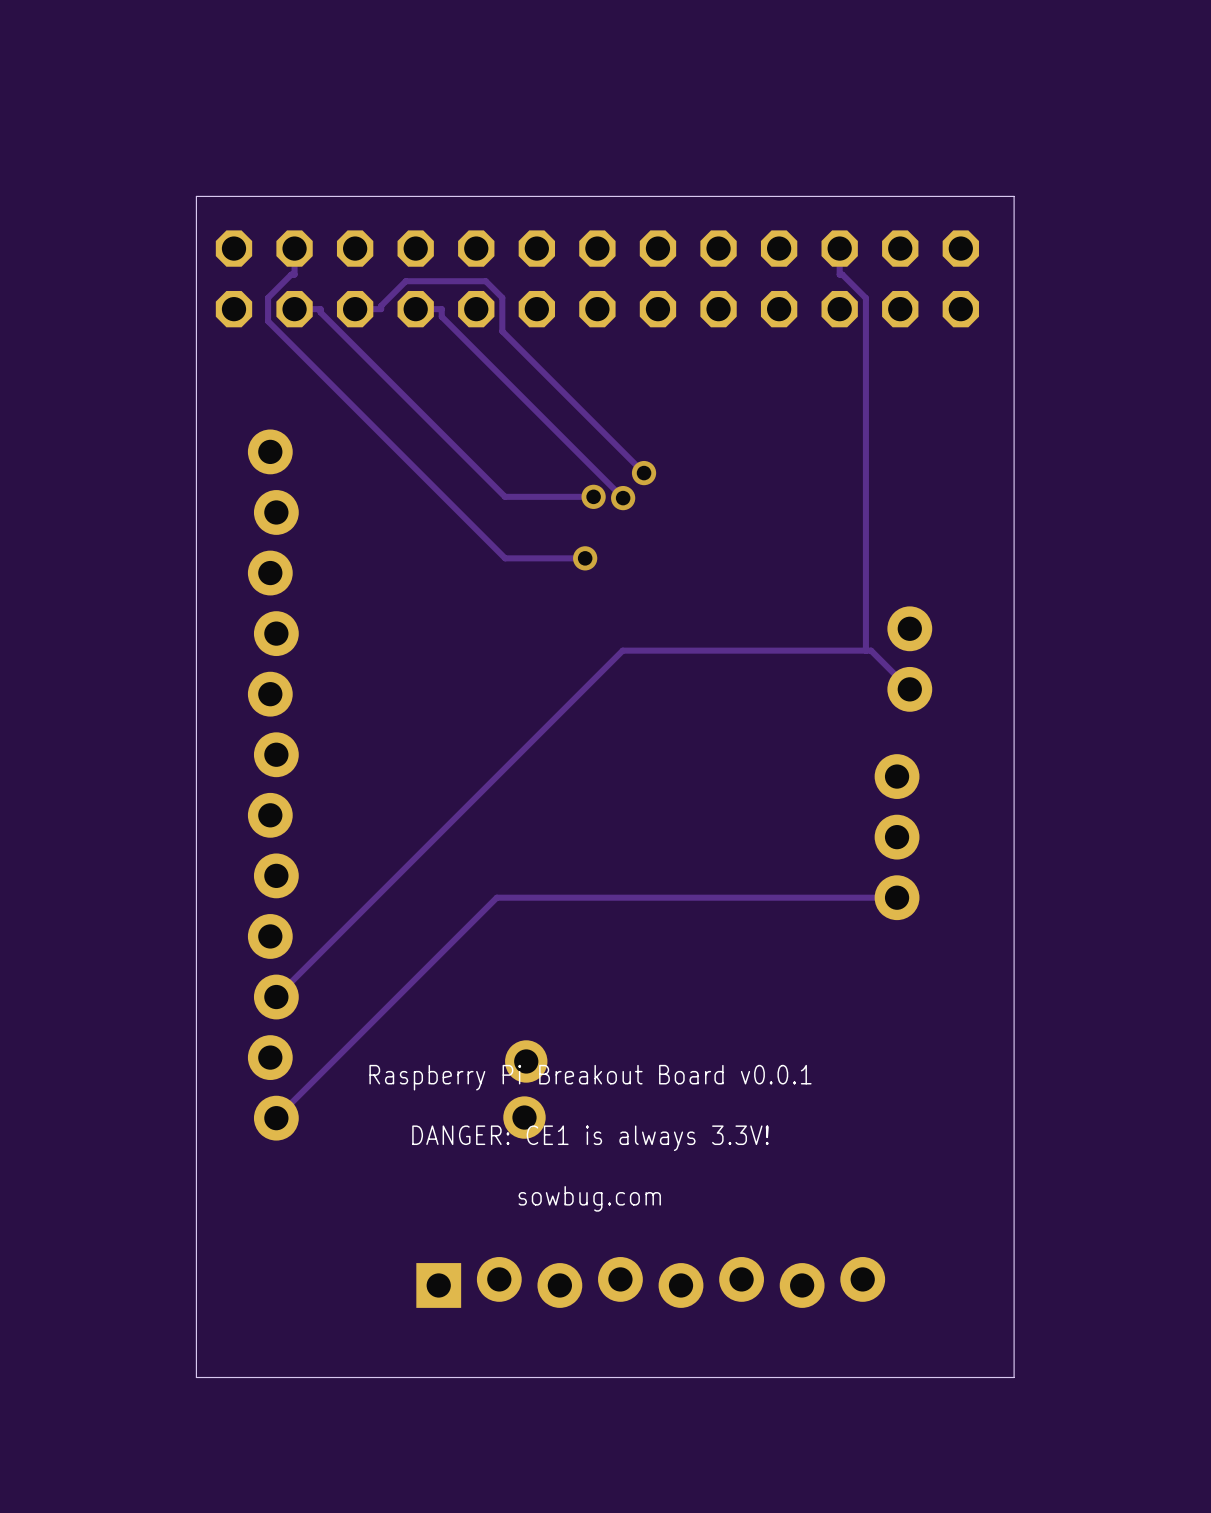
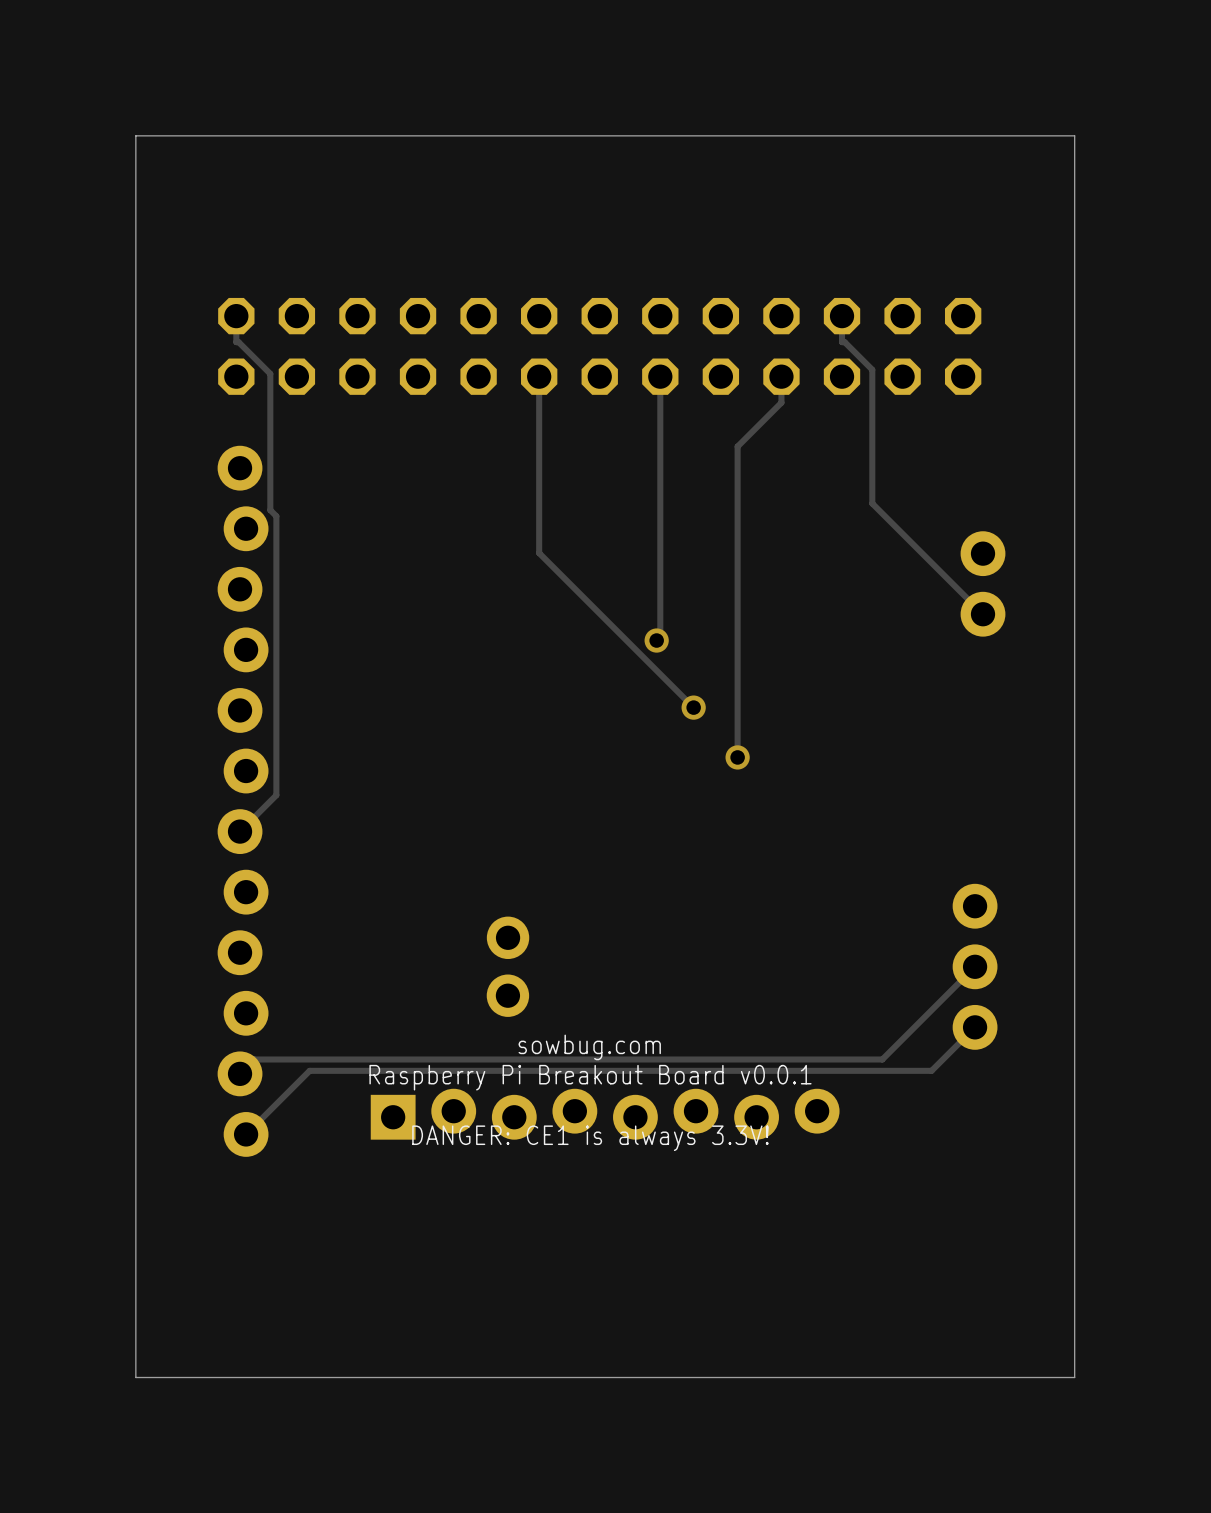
track: (294, 248) (294, 274) (291, 274) (268, 297) (268, 321) (505, 558) (585, 558) -> none
track: (839, 248) (839, 274) (842, 274) (865, 298) (865, 650) -> none
part position: (597, 278) -> (599, 346)
track: (294, 309) (320, 309) (320, 312) (505, 496) (593, 496) -> none
track: (355, 309) (381, 309) (381, 305) (405, 281) (485, 281) (502, 297) (502, 331) (644, 473) -> none
track: (415, 309) (441, 309) (441, 316) (623, 498) -> none
track: none -> (236, 316) (236, 342) (238, 342) (270, 373) (270, 510) (276, 516) (276, 795) (240, 831)
track: none -> (842, 316) (842, 342) (844, 342) (872, 369) (872, 503) (983, 614)
track: none -> (539, 376) (539, 553) (693, 707)
track: none -> (660, 376) (660, 636) (656, 640)
track: none -> (781, 376) (781, 402) (737, 446) (737, 757)
via: (644, 473) -> none
via: (593, 496) -> none
via: (623, 498) -> none
via: (585, 558) -> none
via: none -> (656, 640)
part position: (909, 659) -> (983, 583)
track: (909, 689) (871, 650) (622, 650) (276, 997) -> none
via: none -> (693, 707)
via: none -> (737, 757)
part position: (273, 785) -> (243, 801)
part position: (897, 837) -> (975, 966)
track: (897, 897) (496, 897) (276, 1118) -> none
part: none -> (508, 937)
track: none -> (975, 966) (882, 1059) (254, 1059) (240, 1073)
part: none -> (507, 995)
track: none -> (975, 1027) (931, 1070) (309, 1070) (246, 1134)
part: (526, 1061) -> none
part: (524, 1117) -> none
text position: sowbug.com (589, 1198) -> sowbug.com (589, 1047)
part position: (650, 1282) -> (605, 1114)
board edge: (1014, 1377) (1014, 196) (196, 196) (196, 1377) -> (1014, 1377) (1074, 1377) (1074, 135) (135, 135) (135, 1377) (196, 1377)

